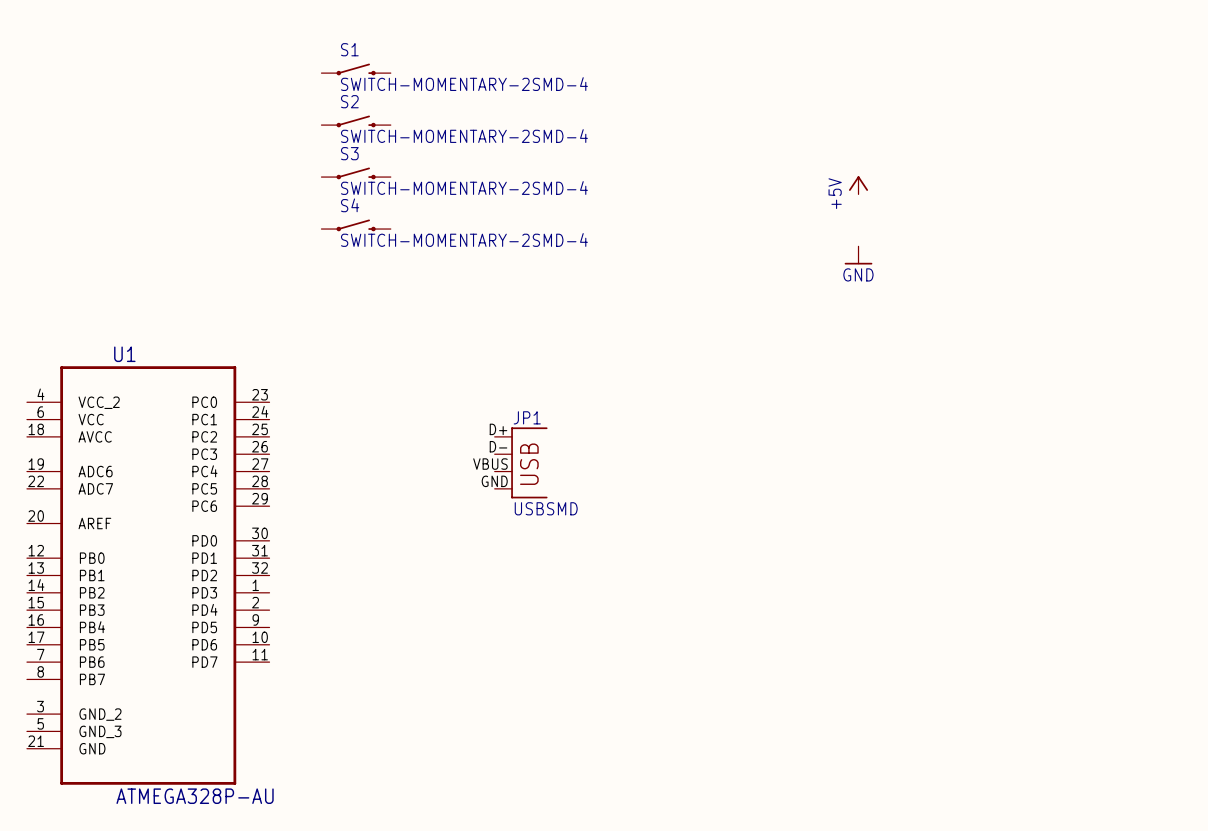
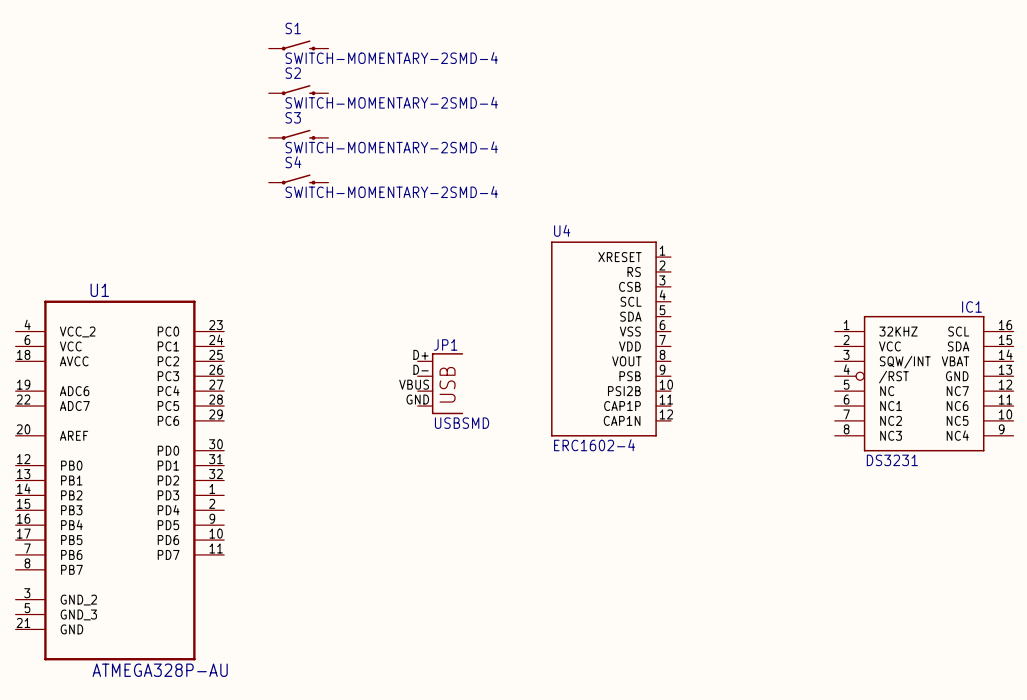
power symbol: +5V (858, 185) -> none
power symbol: GND (858, 255) -> none
U4: none -> ERC1602-4 (611, 338)
IC1: none -> (924, 383)

